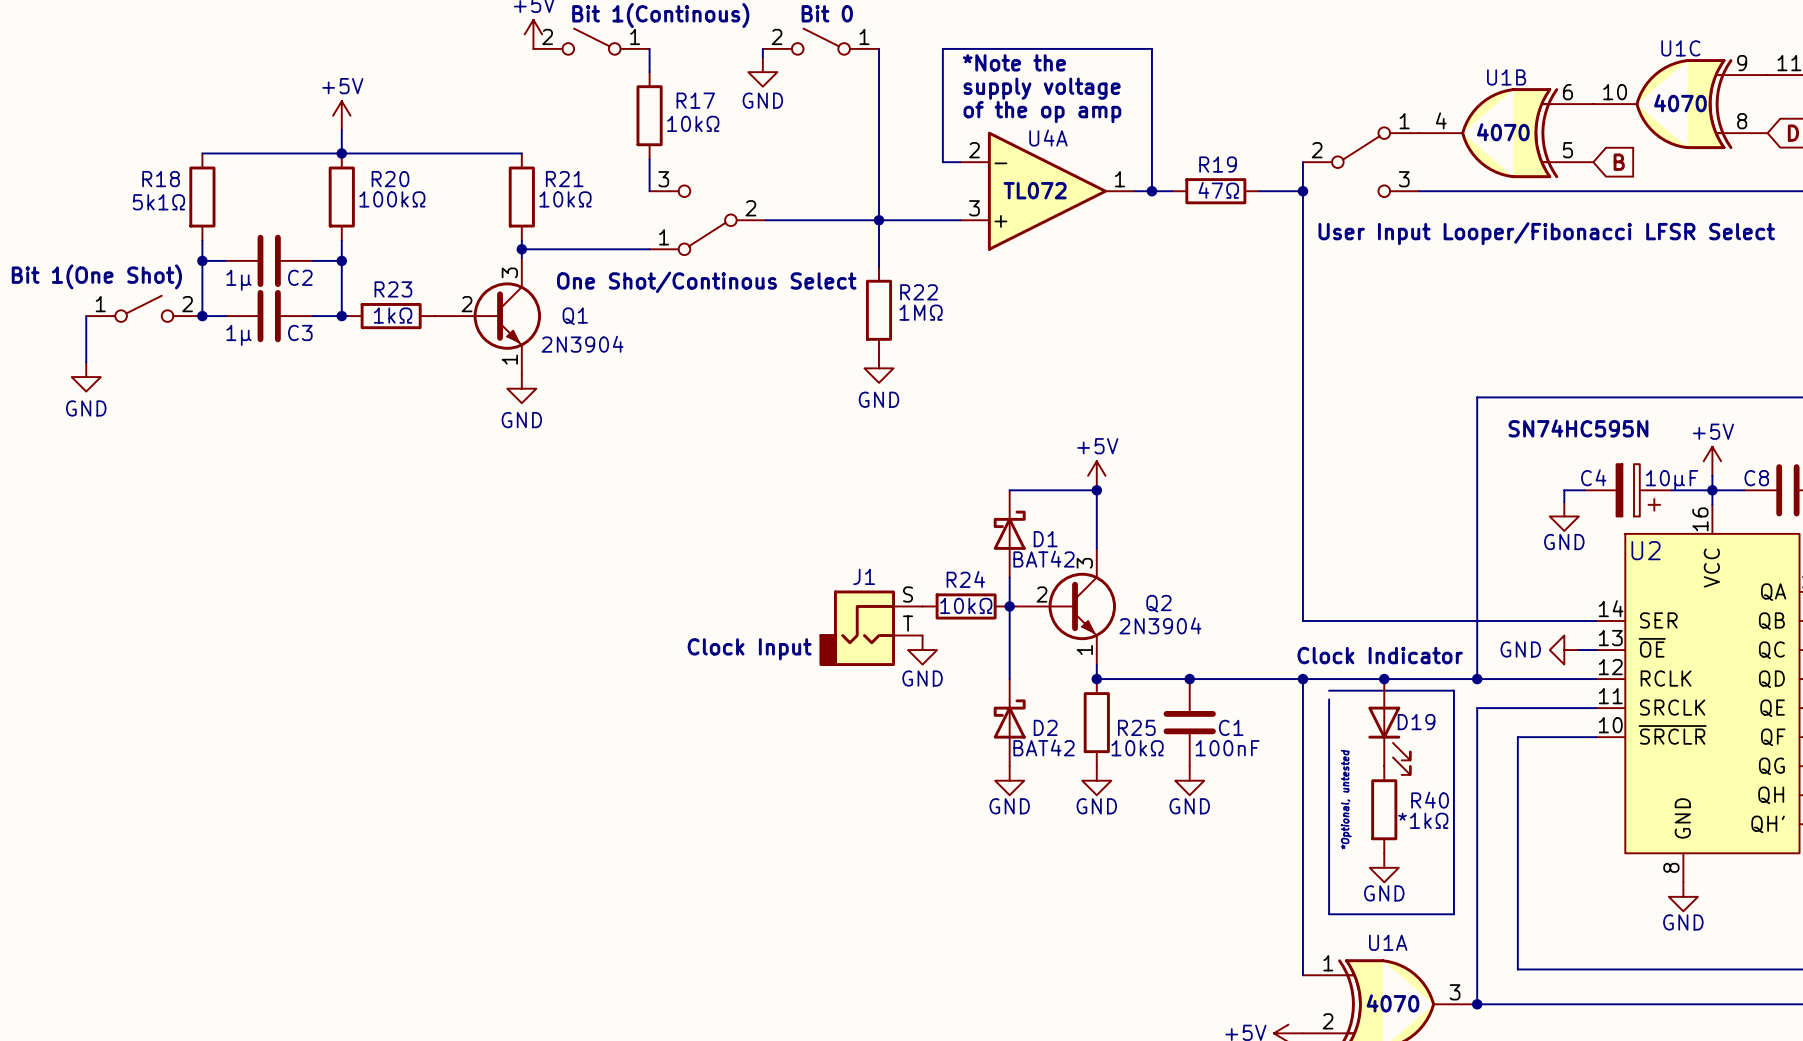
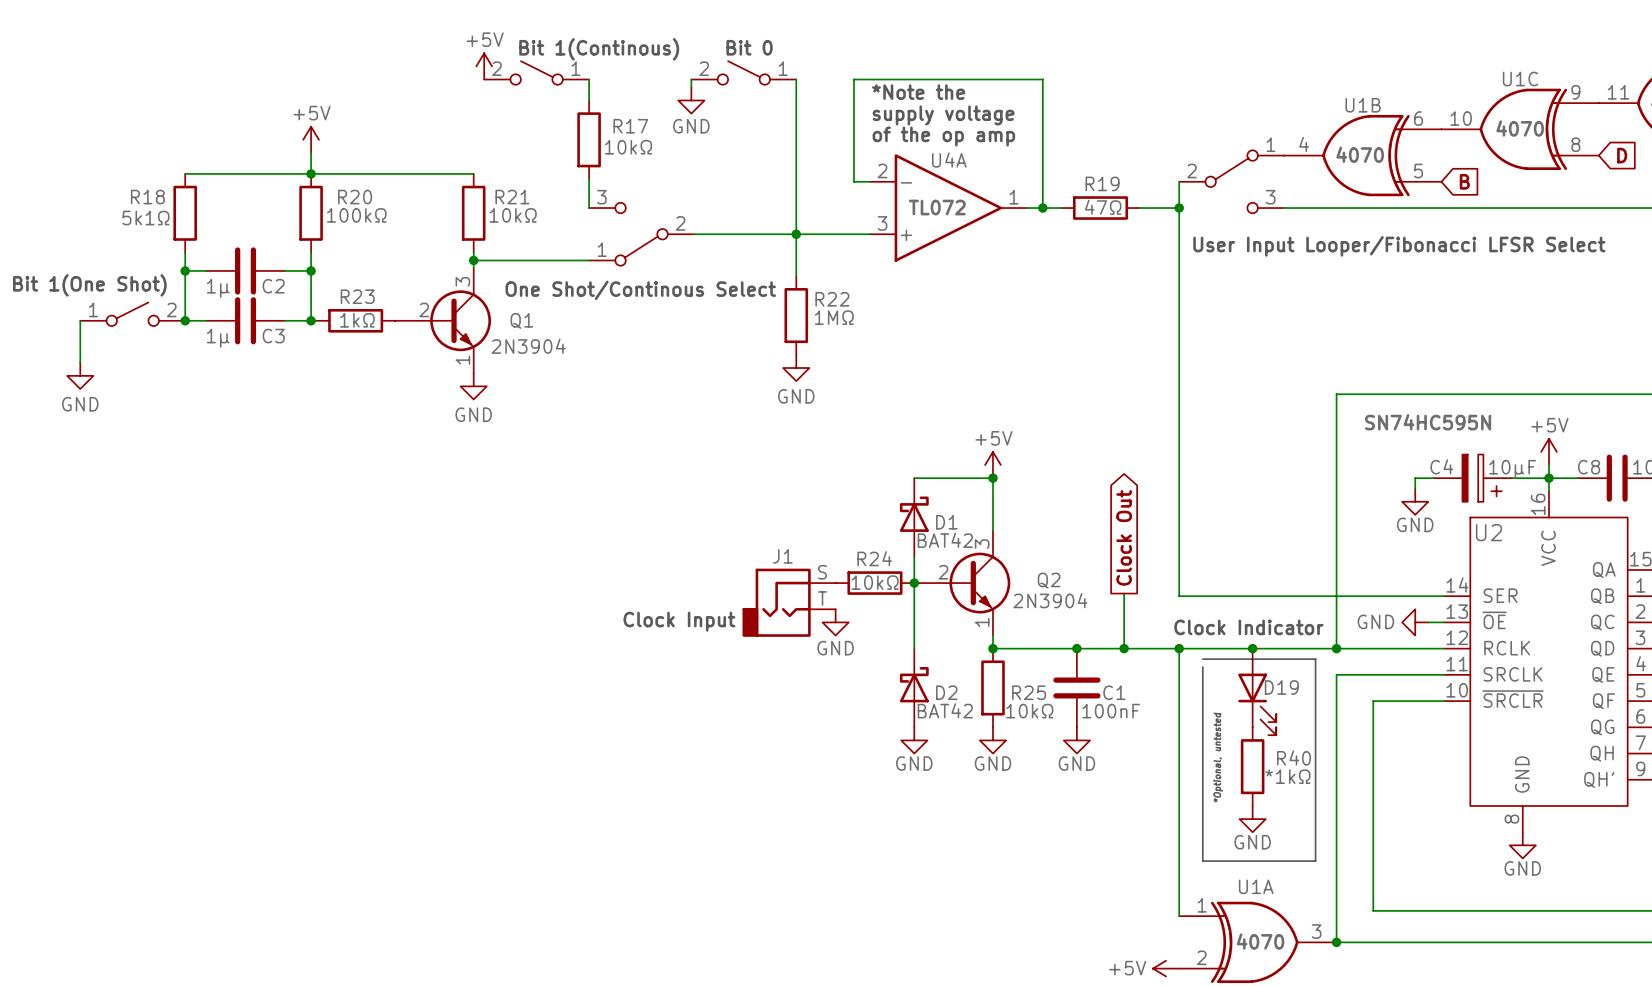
global label: none -> Clock Out (1124, 537)
wire: none -> (1124, 593) (1124, 648)
junction: none -> (1124, 648)

